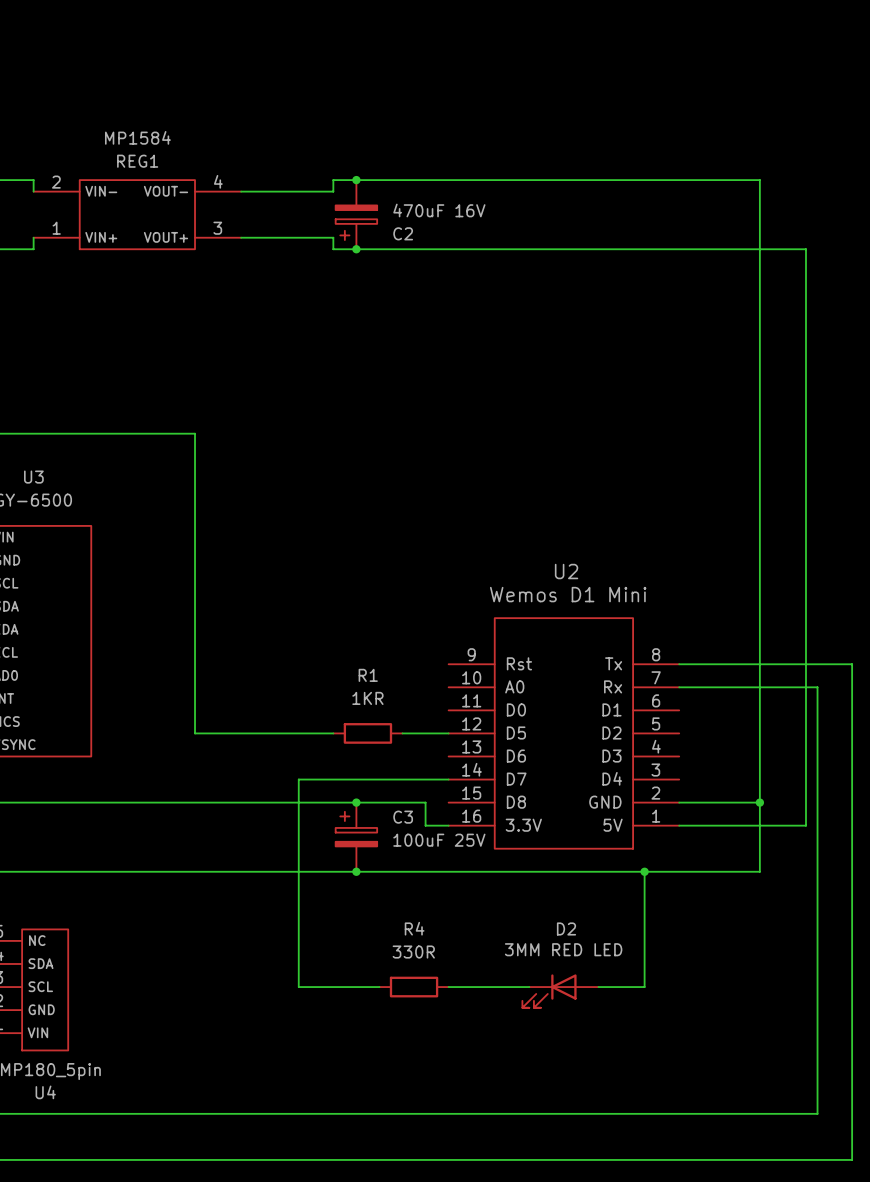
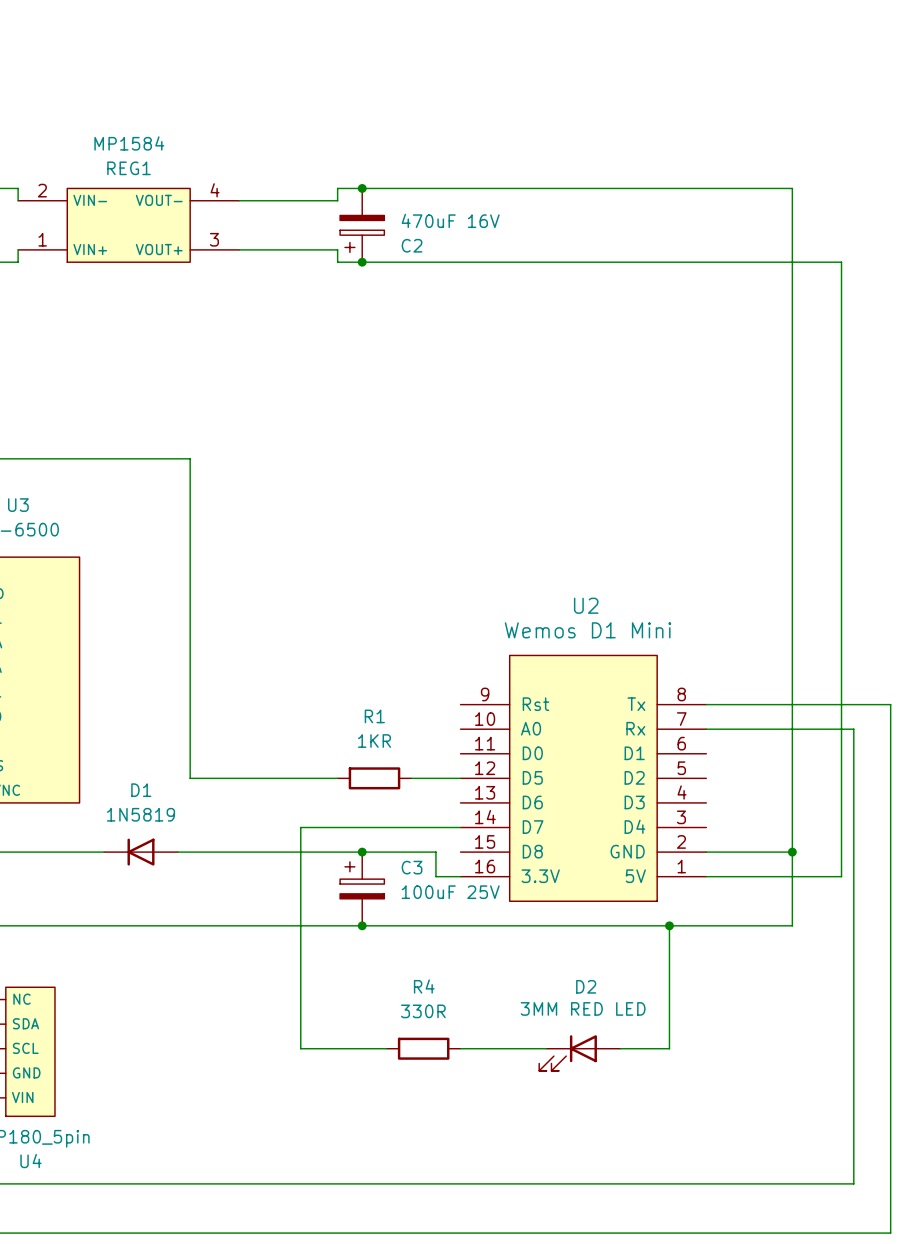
D1: none -> 1N5819 (141, 852)

